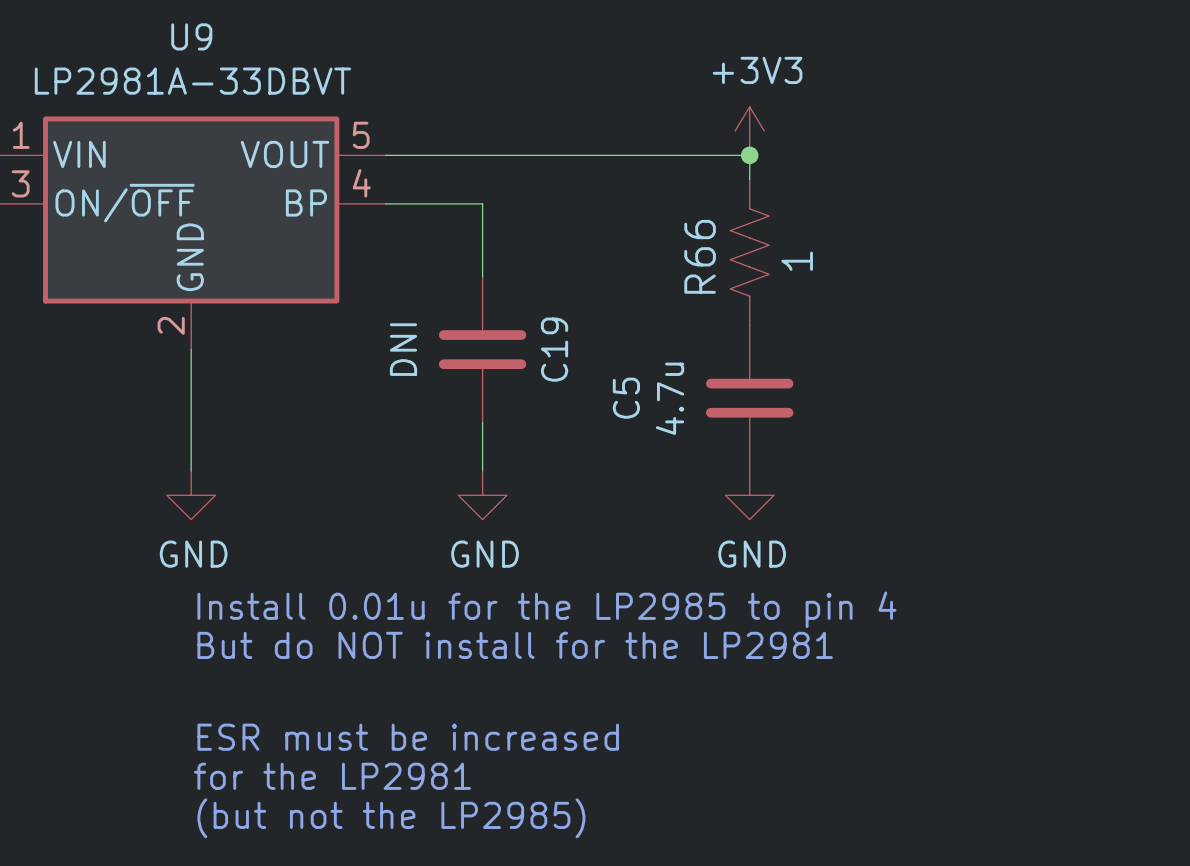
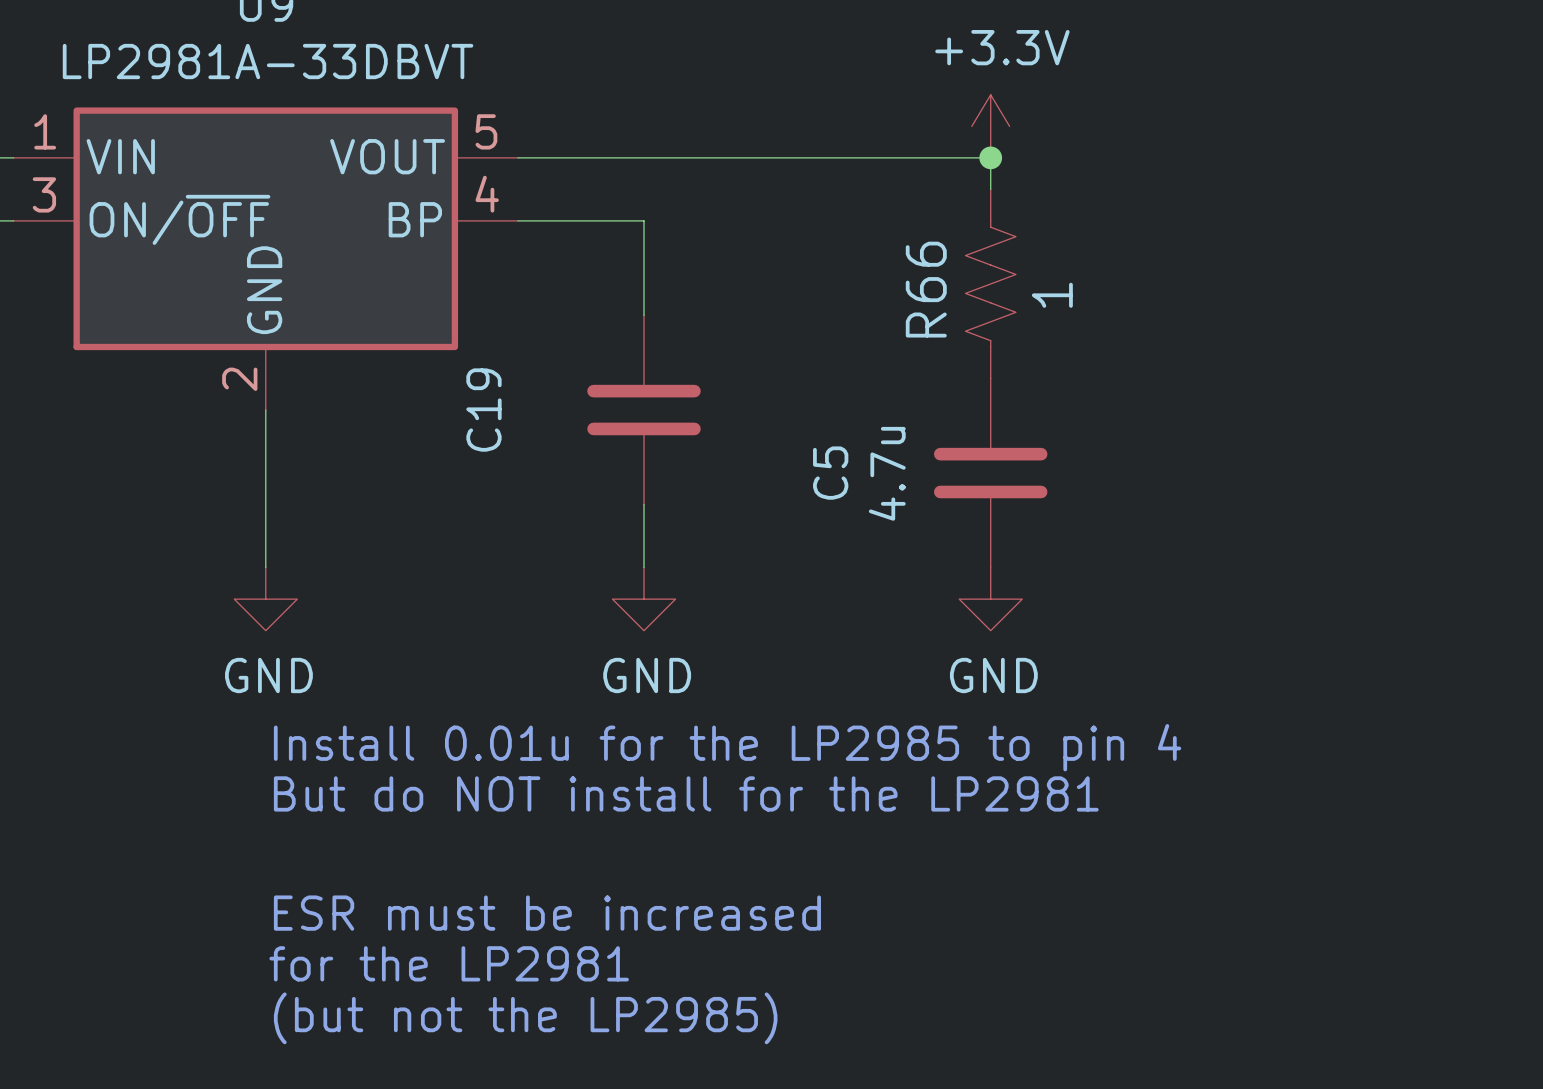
power symbol: +3V3 (749, 131) -> +3.3V (990, 126)
C19 value: DNI (403, 349) -> none
C19 name position: C19 (554, 349) -> C19 (483, 410)

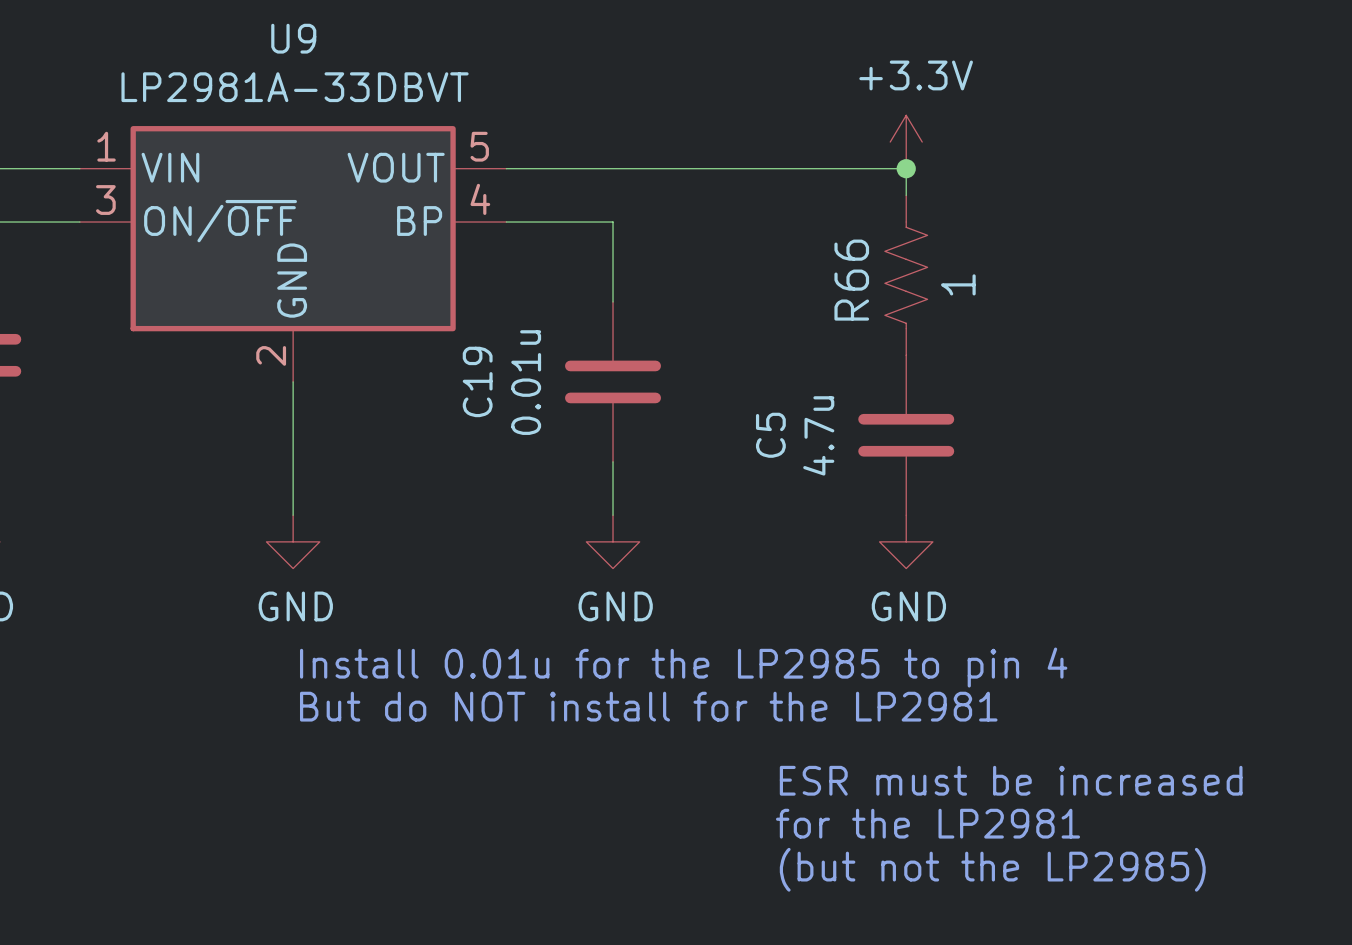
C19 value: none -> 0.01u (526, 382)
text position: ESR must be increased (547, 913) -> ESR must be increased (1011, 780)
text position: for the LP2981 (449, 963) -> for the LP2981 (928, 823)
text position: (but not the LP2985) (525, 1018) -> (but not the LP2985) (992, 869)

